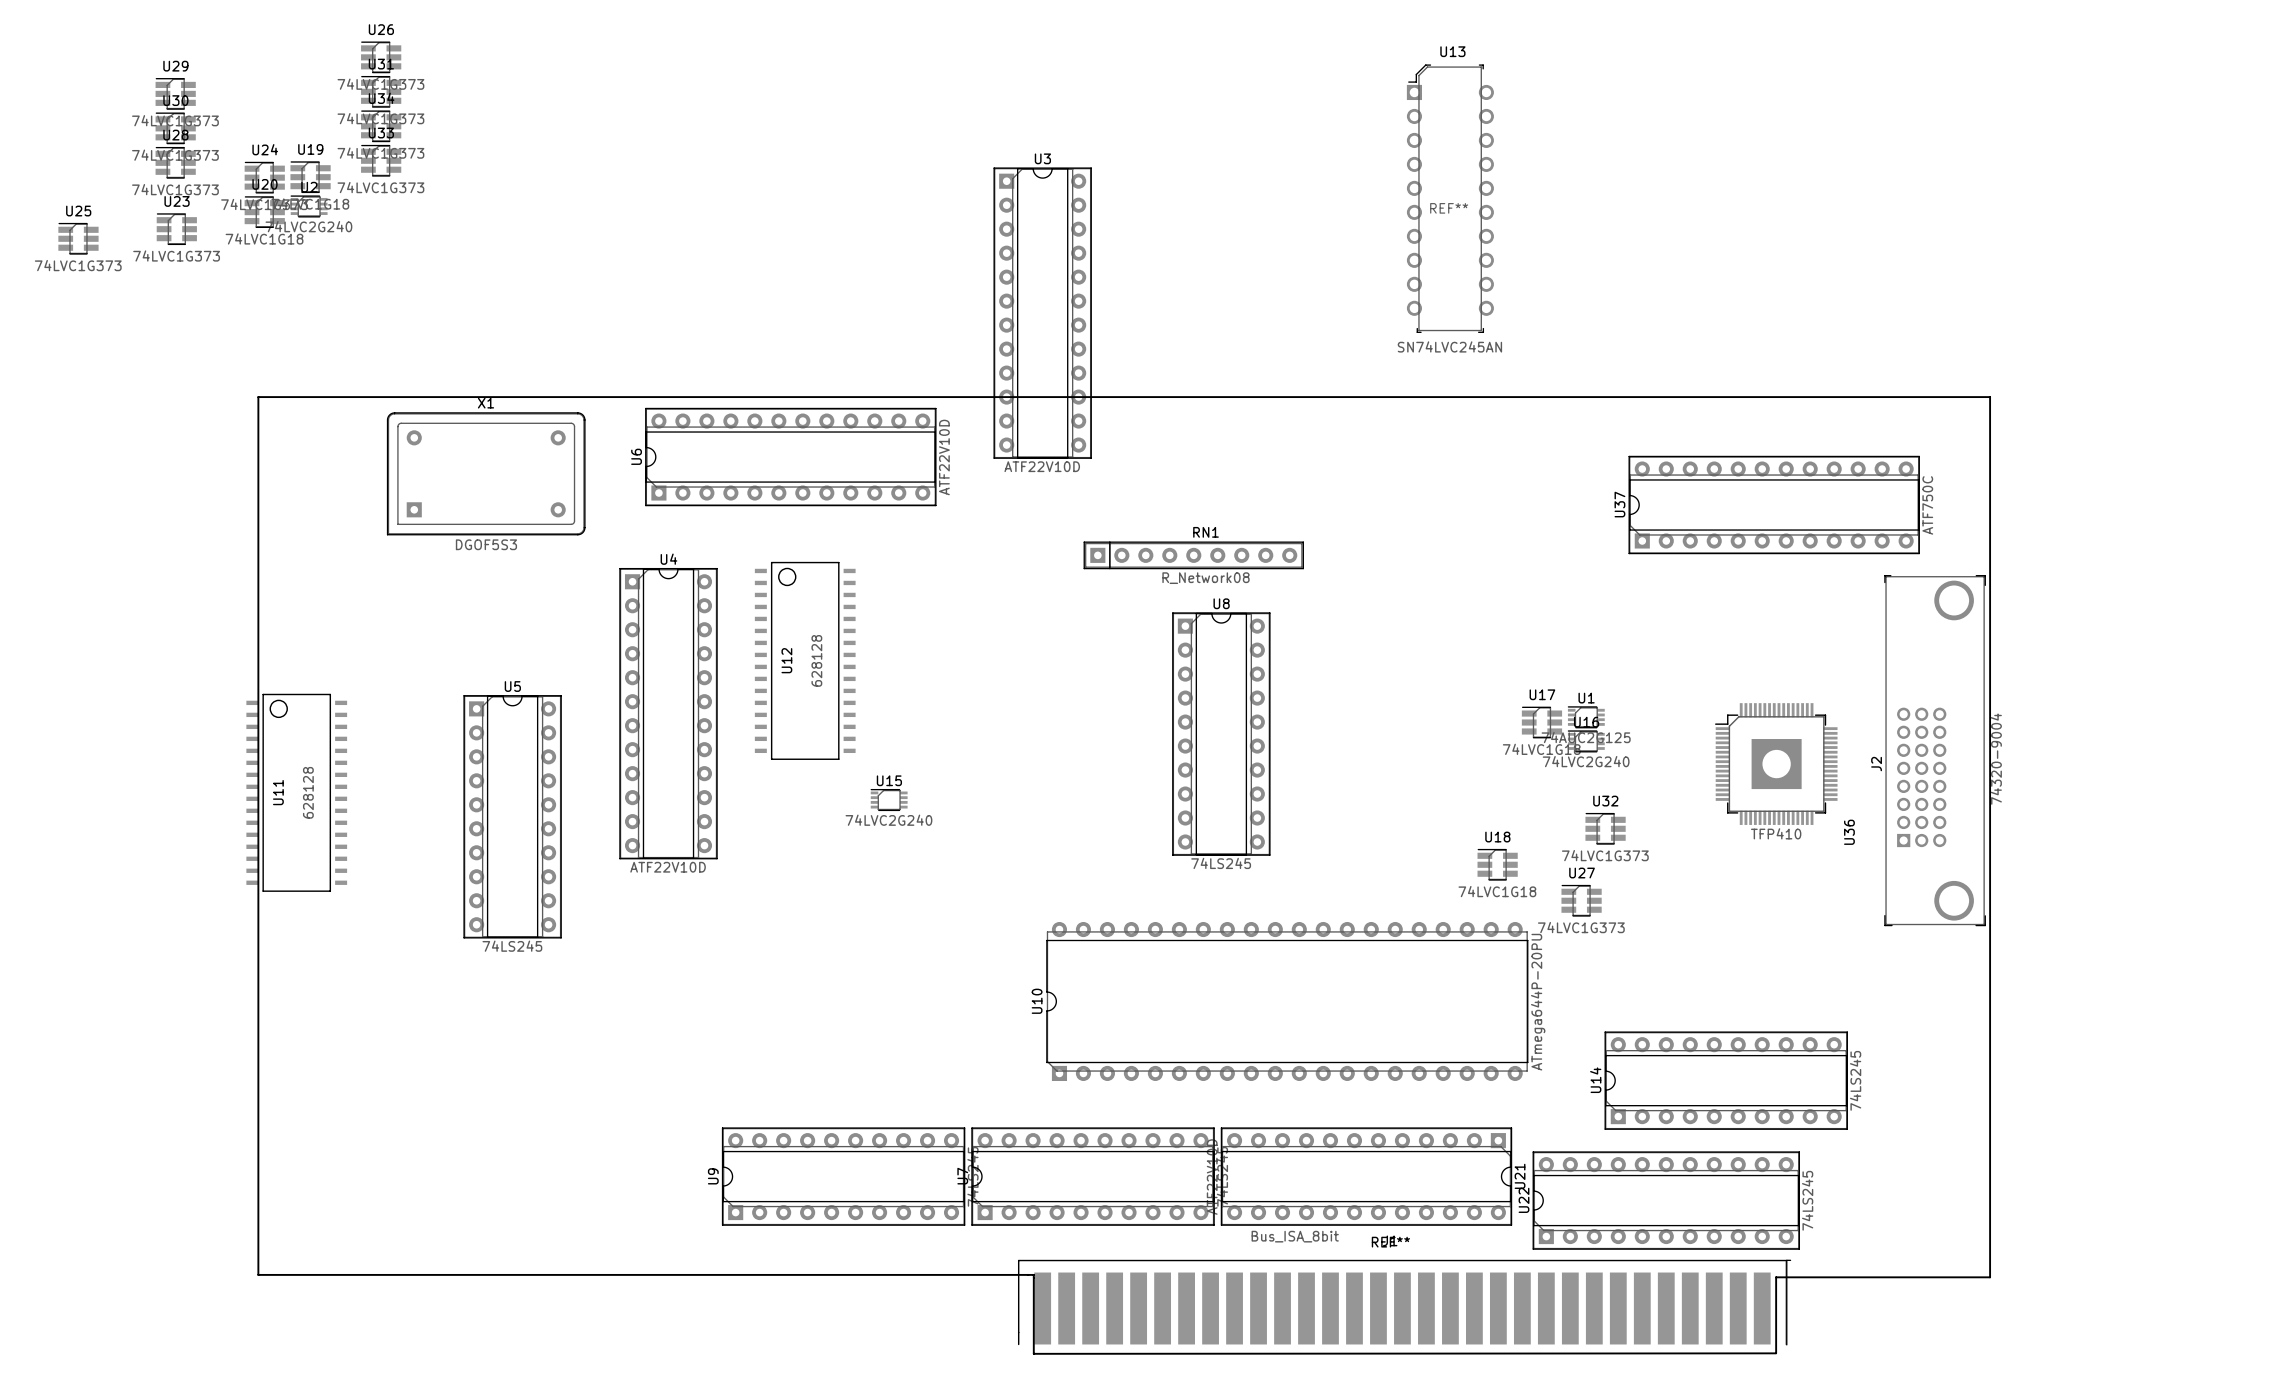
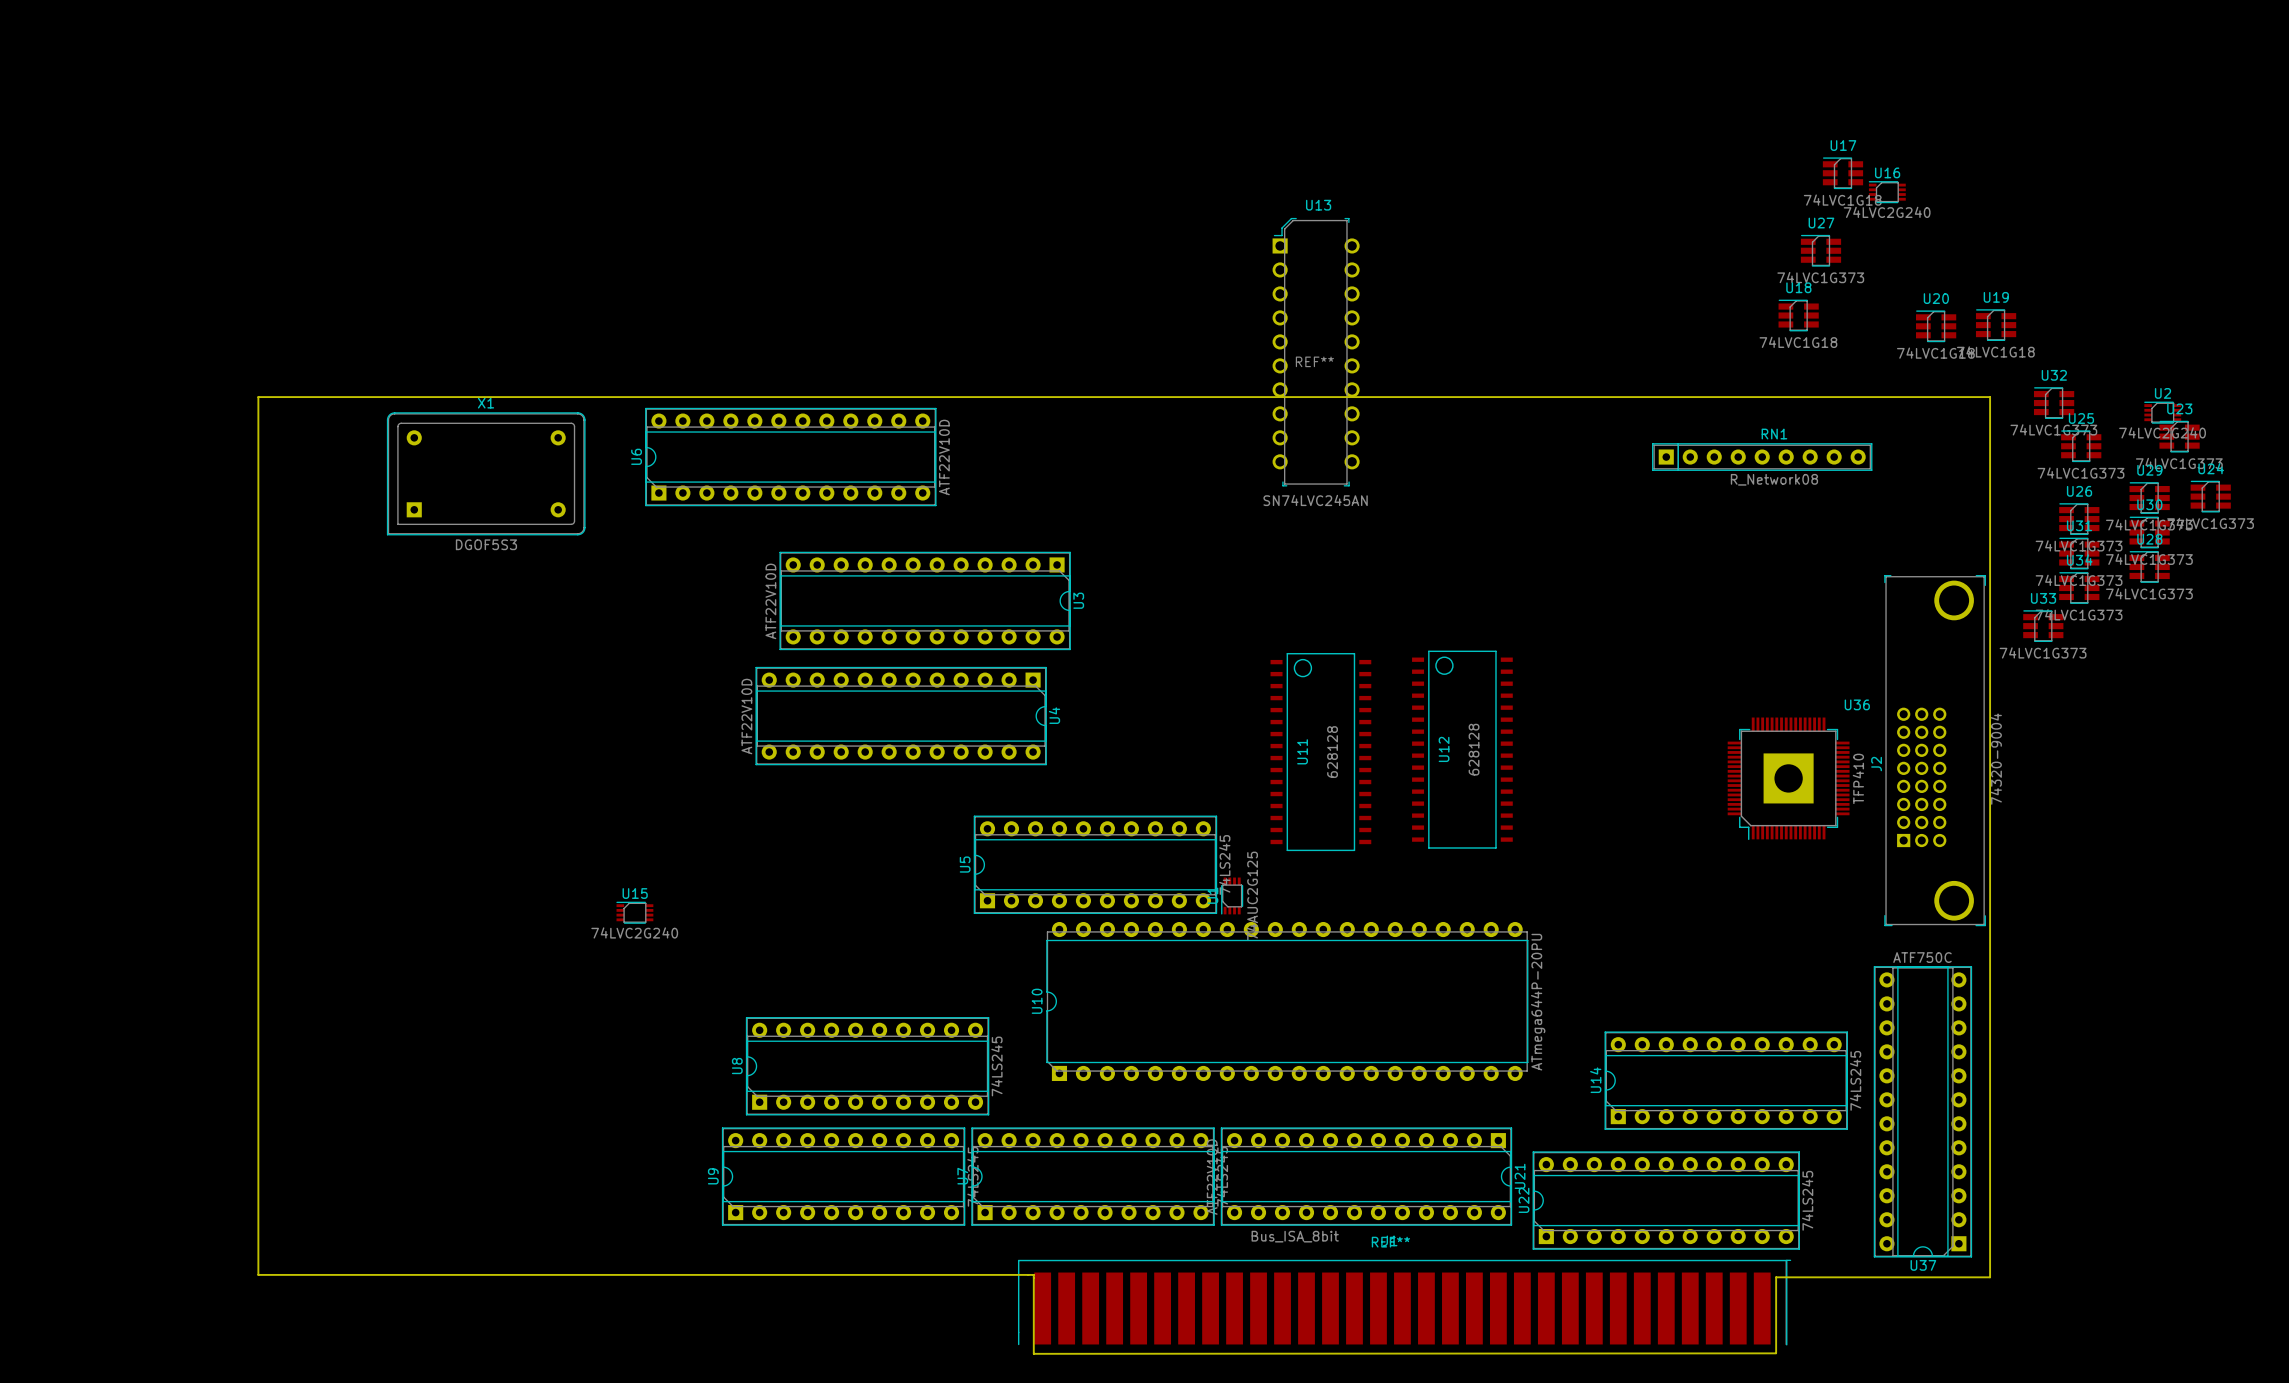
U26 position: (381, 57) -> (2079, 519)
U31 position: (381, 91) -> (2079, 553)
U29 position: (175, 93) -> (2149, 498)
U34 position: (381, 126) -> (2079, 588)
U30 position: (175, 128) -> (2149, 532)
U33 position: (381, 160) -> (2043, 626)
U28 position: (175, 162) -> (2149, 566)
U24 position: (264, 177) -> (2210, 496)
U19 position: (310, 177) -> (1996, 325)
U13 position: (1450, 198) -> (1316, 352)
U2 position: (309, 206) -> (2162, 412)
U20 position: (264, 212) -> (1936, 326)
U23 position: (176, 229) -> (2179, 436)
U25 position: (78, 238) -> (2081, 446)
U3 rotation: 0° (1042, 313) -> 90° clockwise (925, 600)
U3 position: (1042, 313) -> (925, 600)
U37 rotation: 0° (1774, 505) -> 90° counterclockwise (1922, 1111)
U37 position: (1774, 505) -> (1922, 1111)
RN1 position: (1193, 555) -> (1762, 457)
U12 position: (805, 660) -> (1462, 749)
U4 rotation: 0° (668, 713) -> 90° clockwise (901, 716)
U4 position: (668, 713) -> (901, 716)
U1 rotation: 0° (1586, 717) -> 90° counterclockwise (1232, 896)
U1 position: (1586, 717) -> (1232, 896)
U17 position: (1541, 722) -> (1842, 173)
U8 rotation: 0° (1221, 734) -> 90° counterclockwise (867, 1066)
U8 position: (1221, 734) -> (867, 1066)
U16 position: (1586, 741) -> (1887, 192)
U36 rotation: 0° (1776, 764) -> 90° counterclockwise (1788, 778)
U11 position: (296, 792) -> (1320, 752)
U15 position: (889, 800) -> (634, 912)
U5 rotation: 0° (512, 816) -> 90° counterclockwise (1095, 864)
U5 position: (512, 816) -> (1095, 864)
U32 position: (1605, 828) -> (2054, 403)
U18 position: (1497, 864) -> (1798, 315)
U27 position: (1581, 900) -> (1820, 250)

